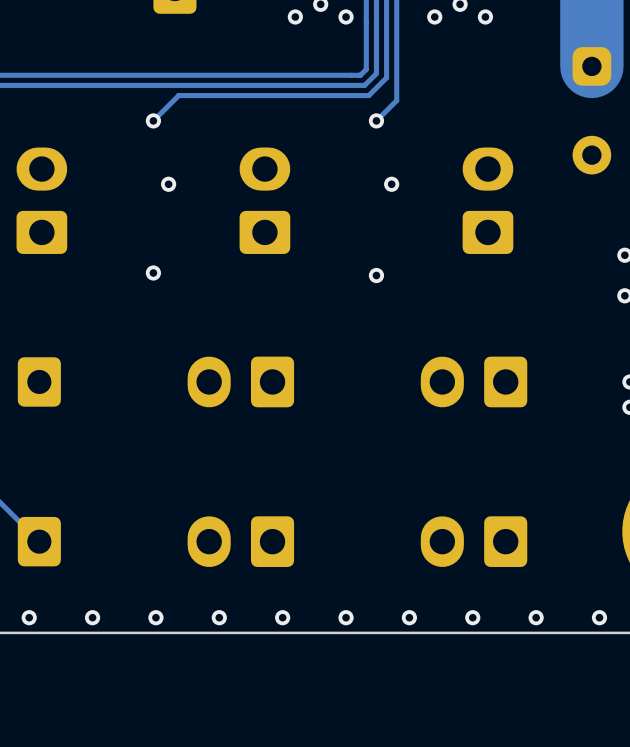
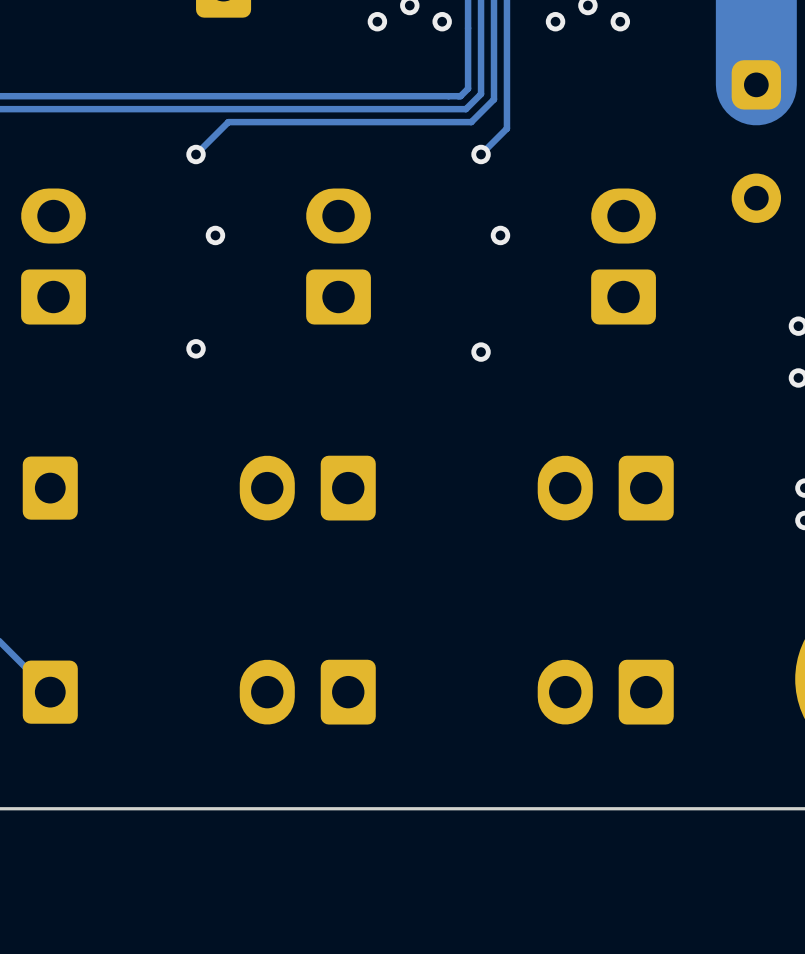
via: (29, 617) -> none
via: (92, 617) -> none
via: (155, 617) -> none
via: (219, 617) -> none
via: (282, 617) -> none
via: (346, 617) -> none
via: (409, 617) -> none
via: (472, 617) -> none
via: (536, 617) -> none
via: (599, 617) -> none

